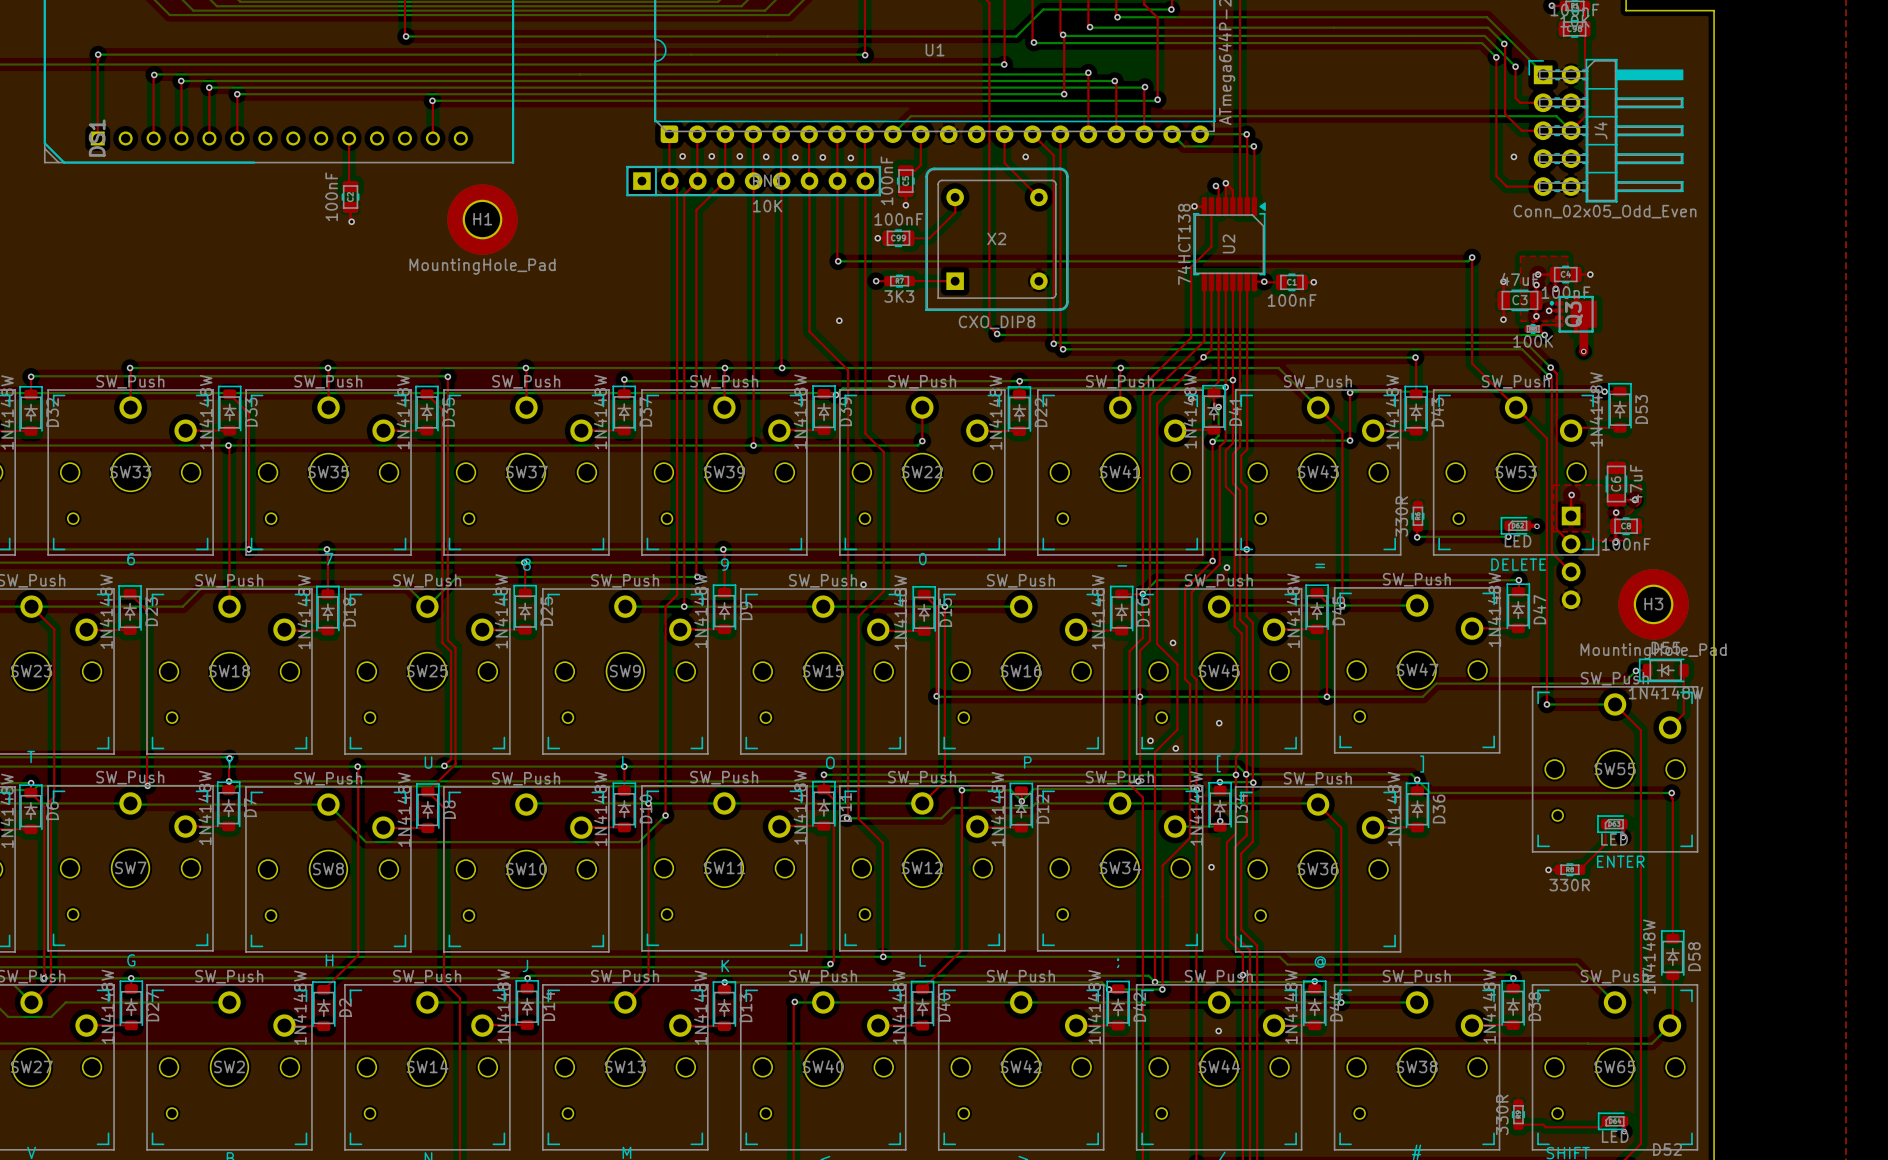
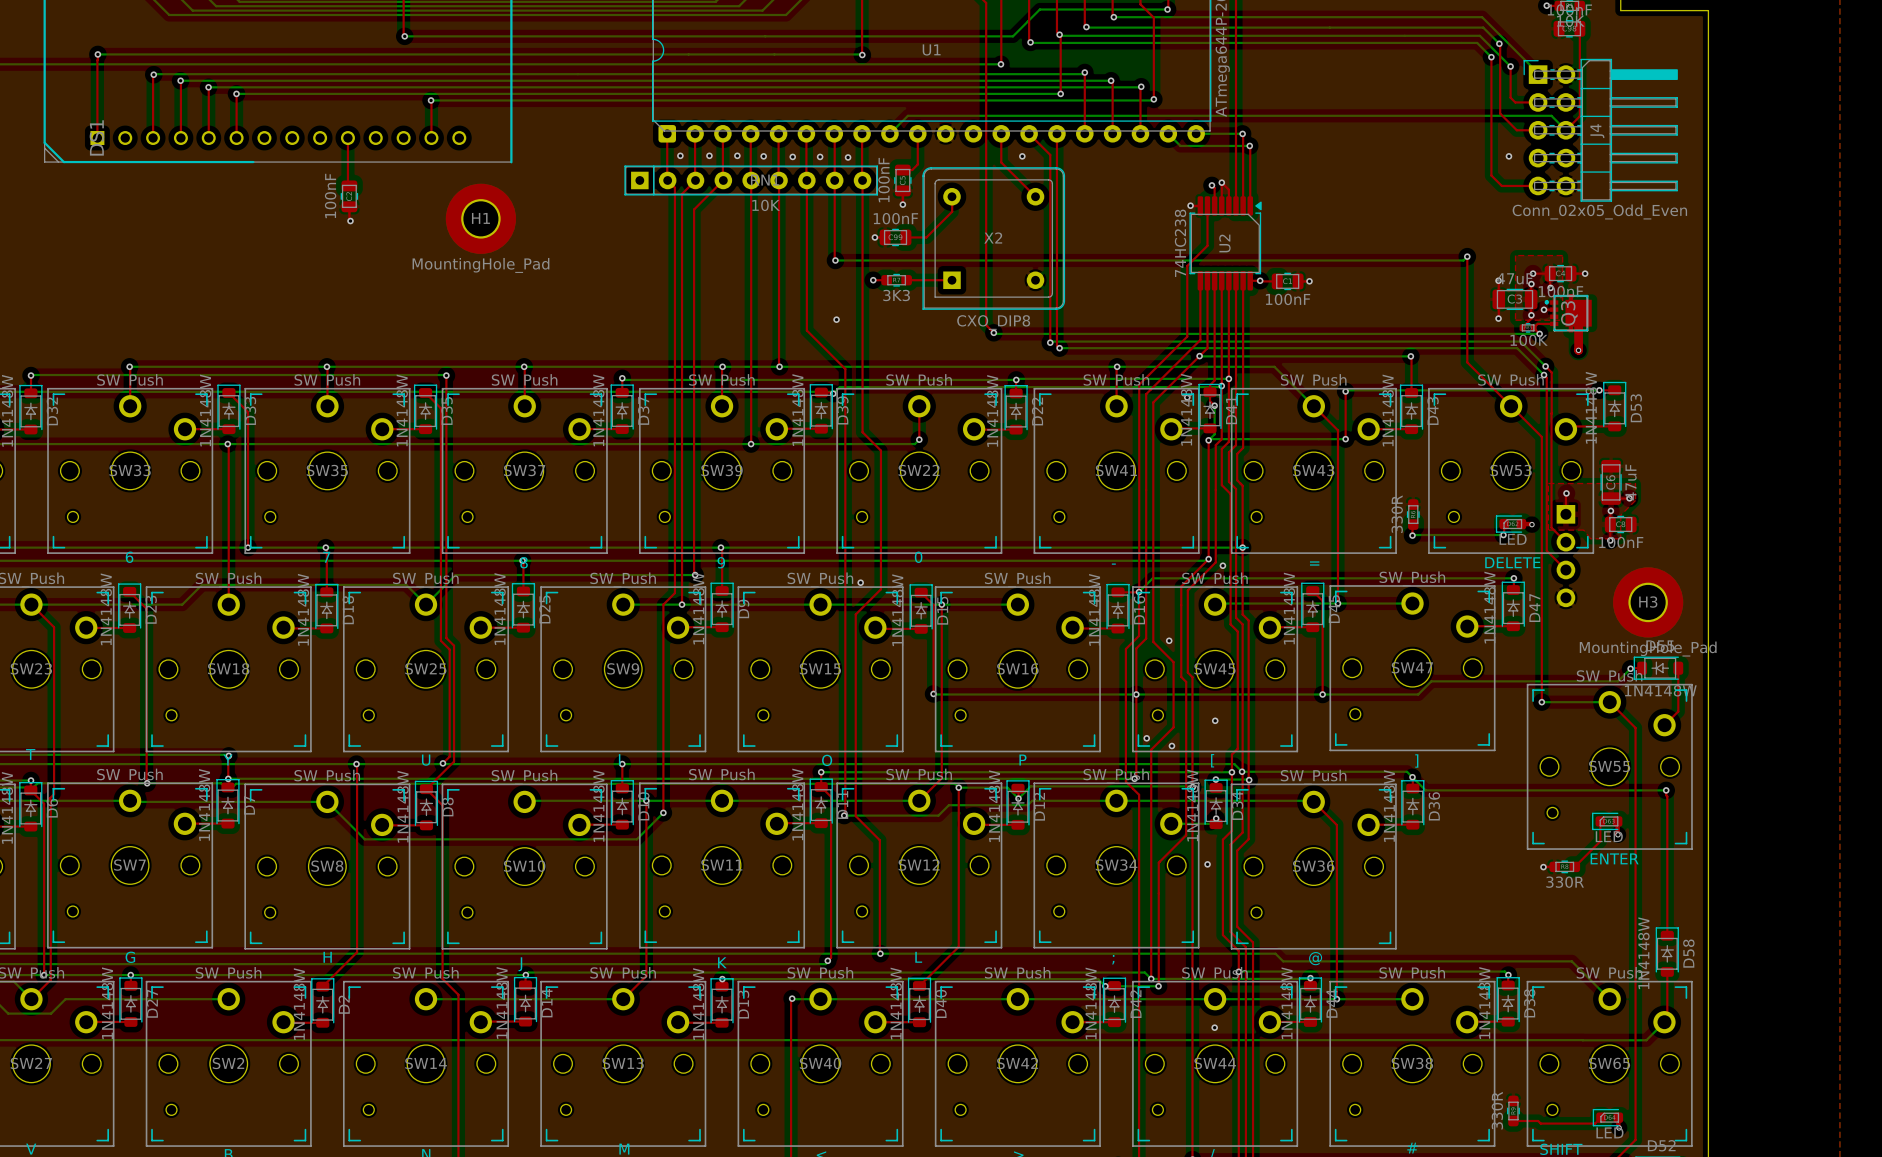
U2 value: 74HCT138 (1184, 244) -> 74HC238 (1180, 243)

